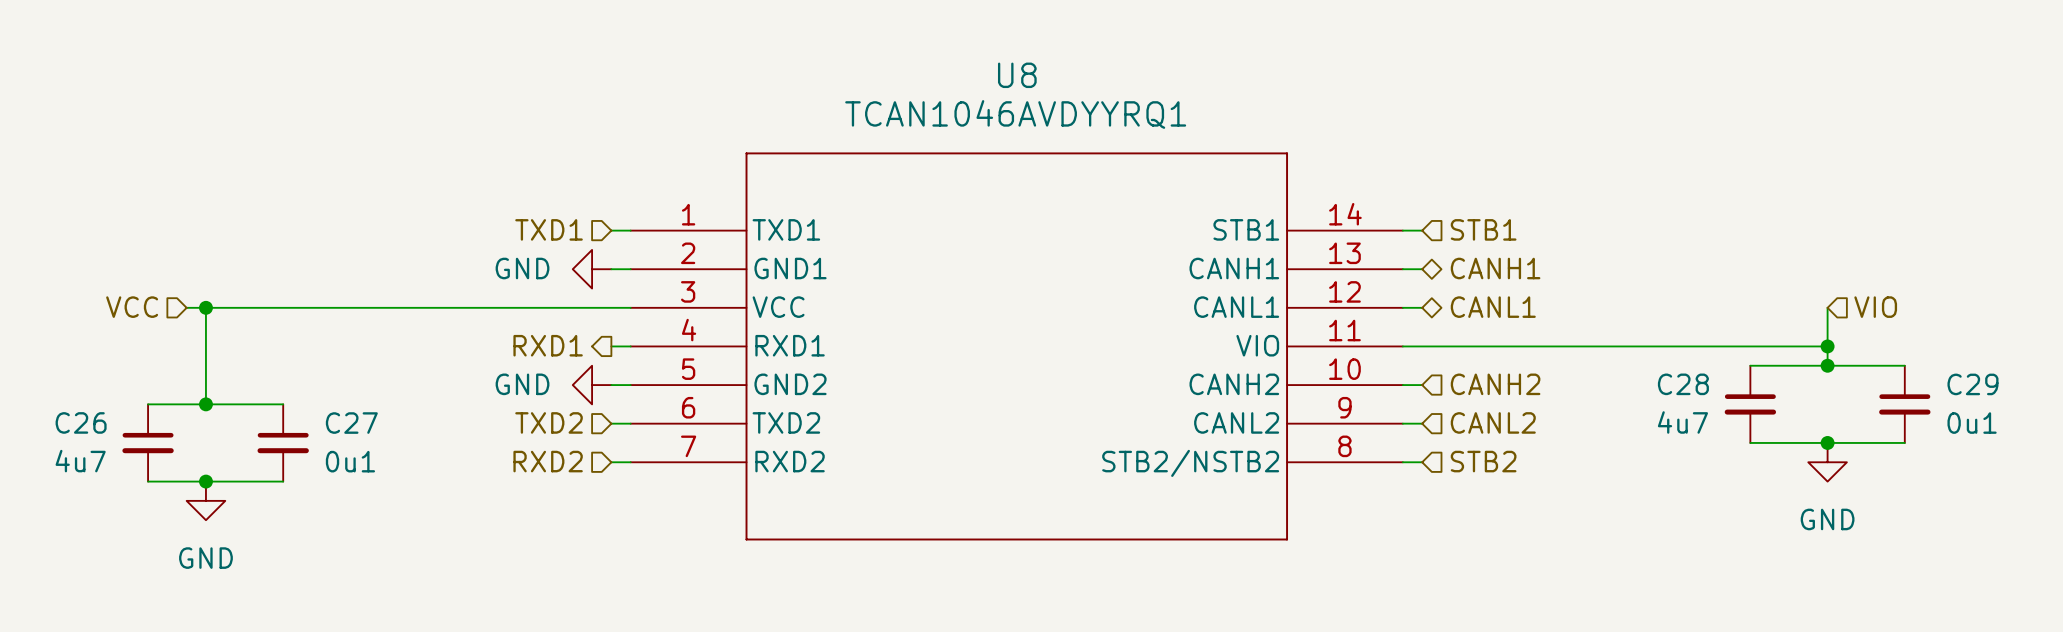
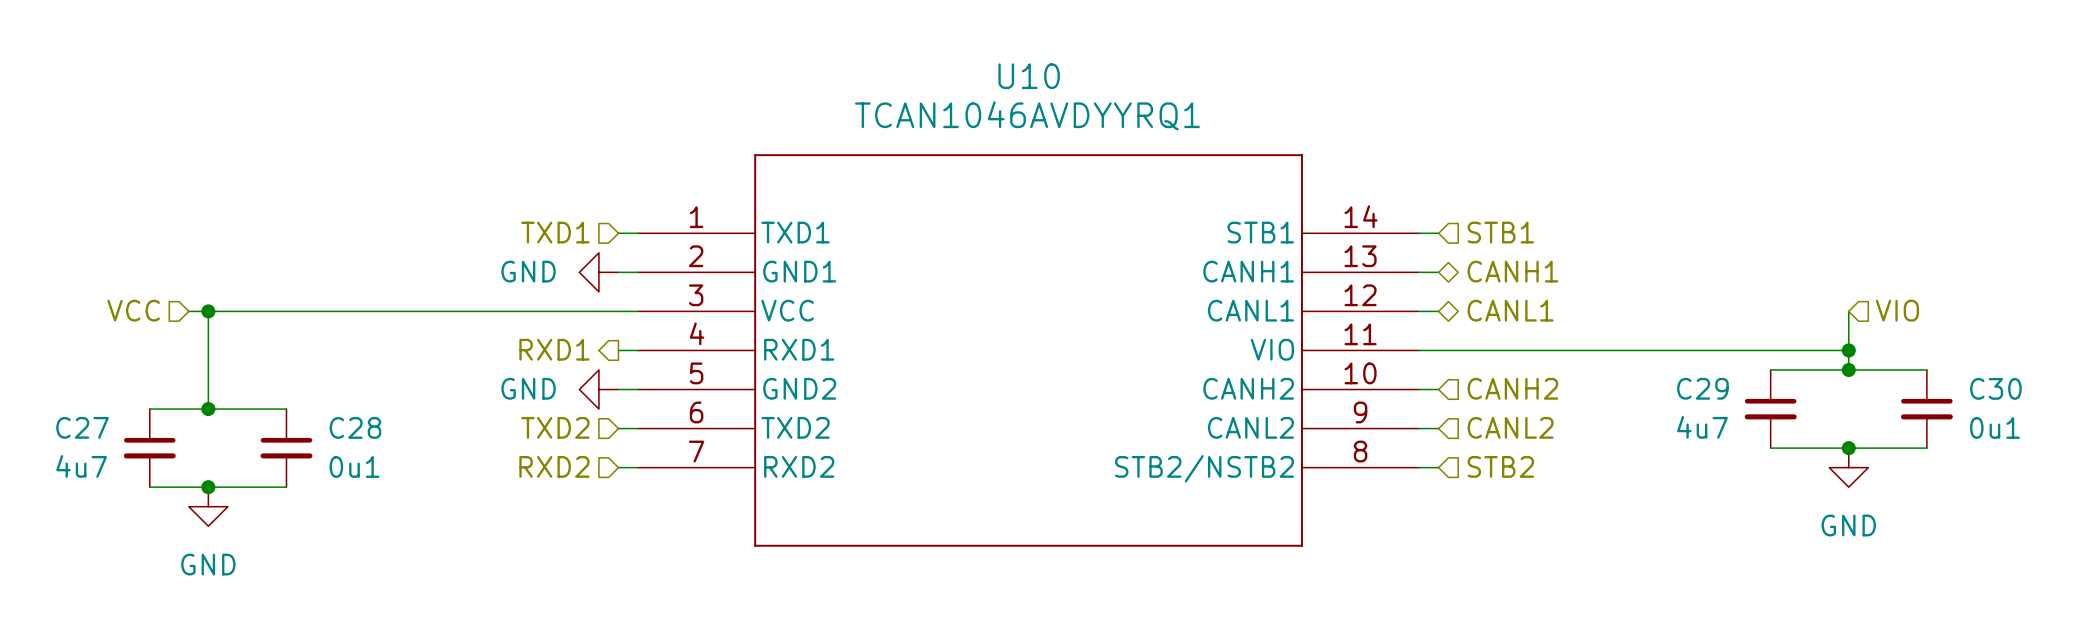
U8 name: U8 (1017, 75) -> U10 (1029, 76)
C28 name: C28 (1683, 384) -> C29 (1702, 388)
C29 name: C29 (1972, 384) -> C30 (1995, 388)
C26 name: C26 (81, 422) -> C27 (82, 427)
C27 name: C27 (351, 423) -> C28 (355, 427)

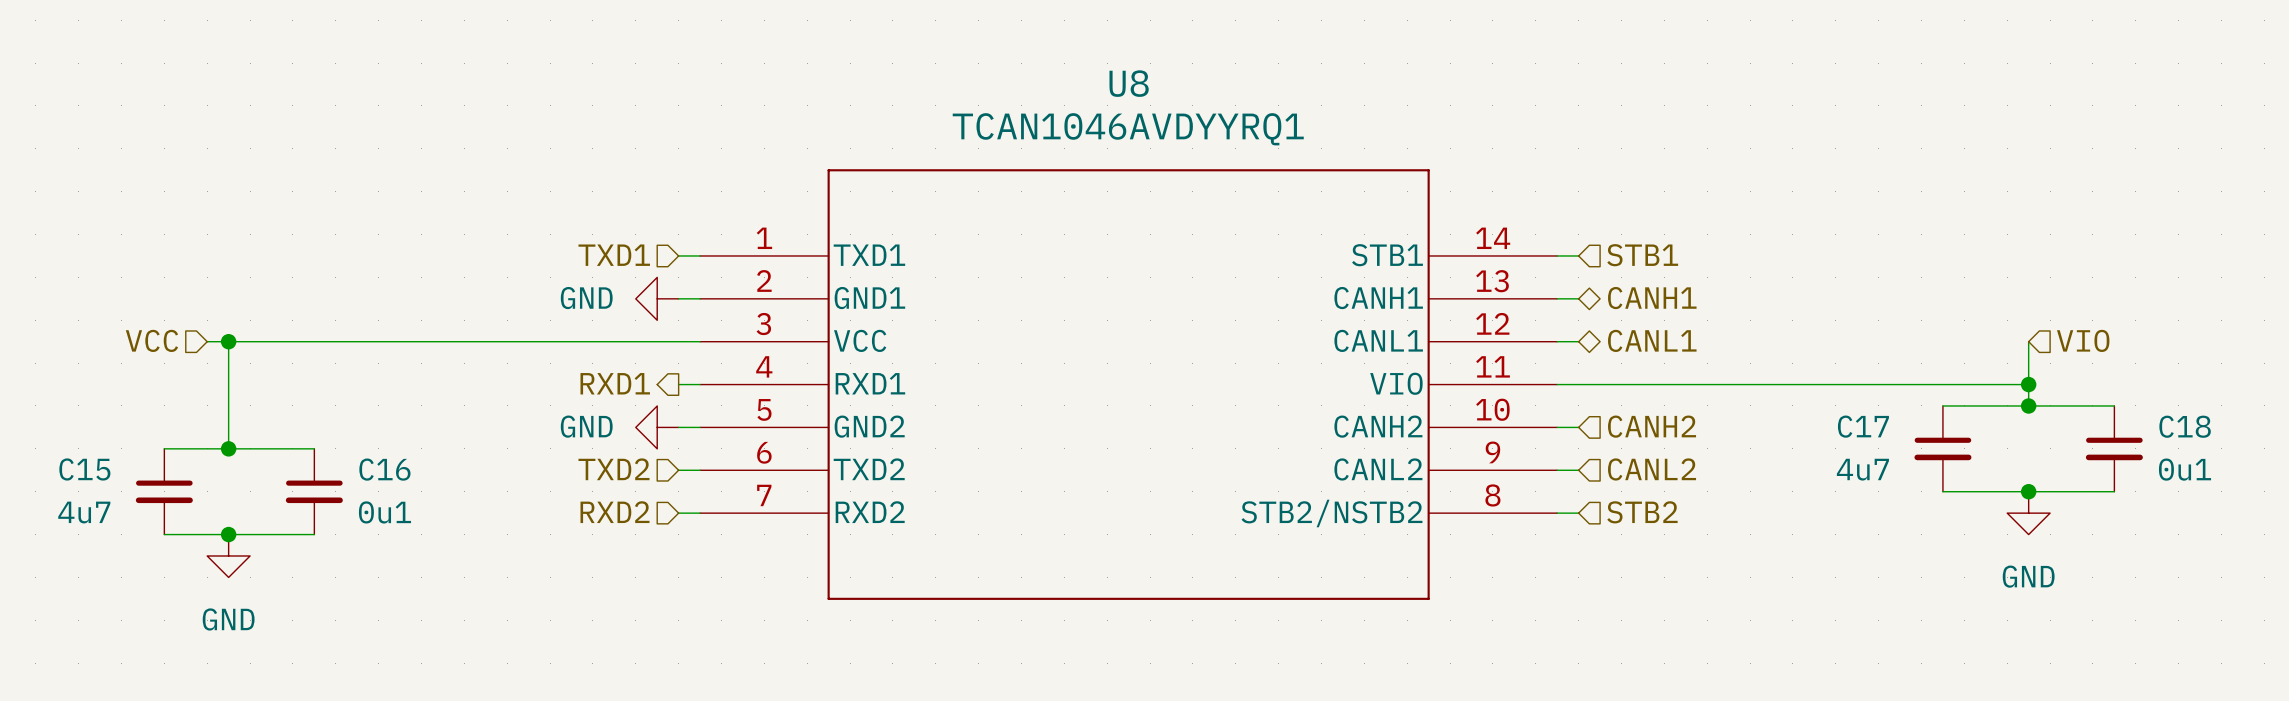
U10 name: U10 (1029, 76) -> U8 (1129, 83)
C29 name: C29 (1702, 388) -> C17 (1863, 426)
C30 name: C30 (1995, 388) -> C18 (2185, 426)
C27 name: C27 (82, 427) -> C15 (84, 469)
C28 name: C28 (355, 427) -> C16 (384, 469)

